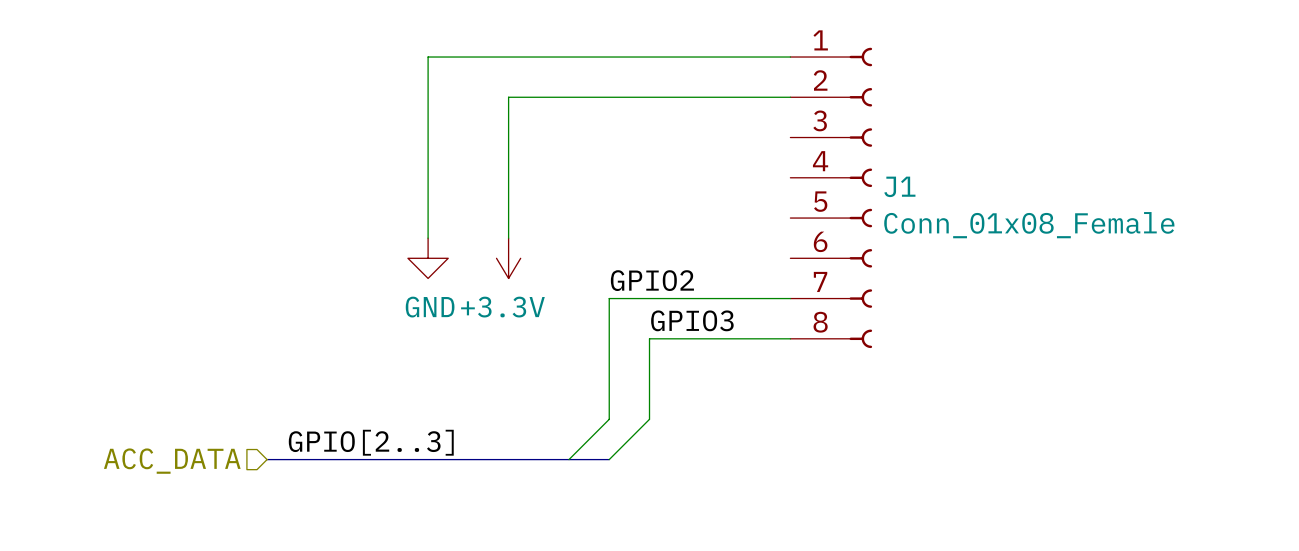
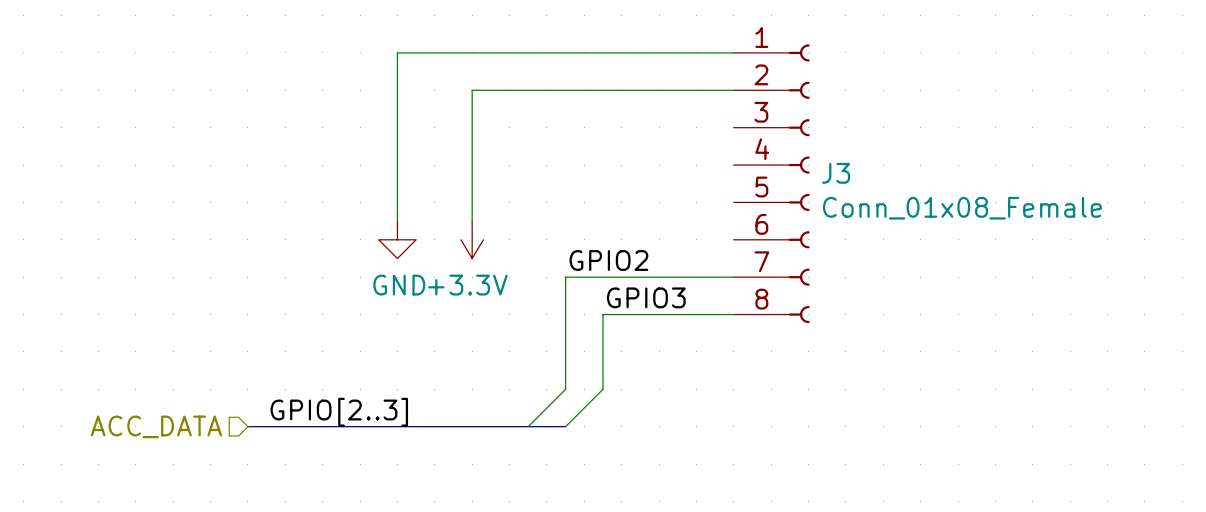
J1 name: J1 (899, 186) -> J3 (836, 173)

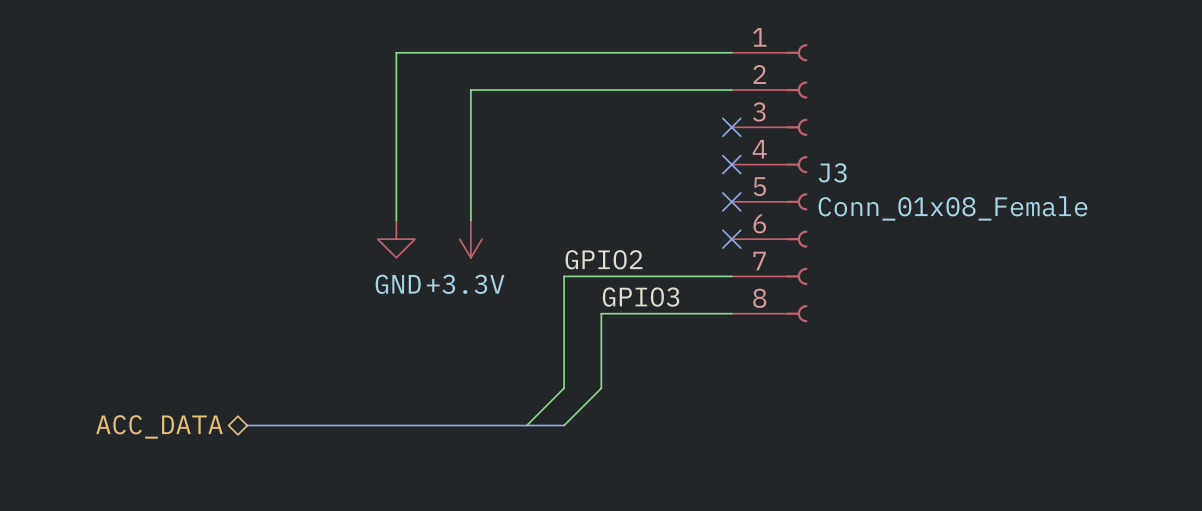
no-connect mark: none -> (731, 127)
no-connect mark: none -> (731, 164)
no-connect mark: none -> (731, 201)
no-connect mark: none -> (731, 239)
label: GPIO[2..3] (339, 412) -> none
hierarchical label shape: input (156, 426) -> bidirectional (159, 426)

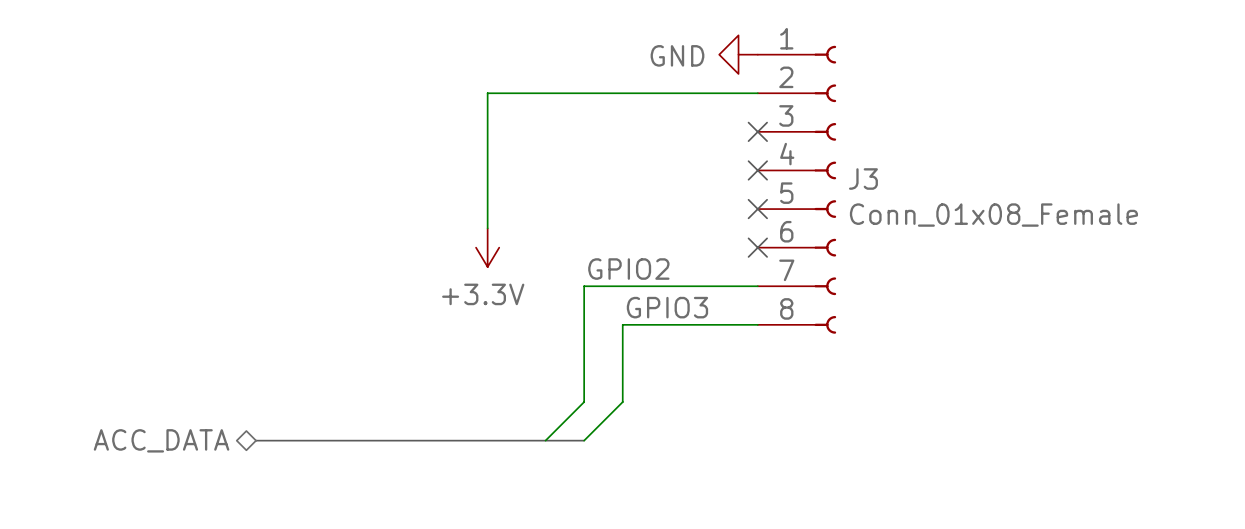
power symbol: none -> GND (738, 54)
wire: (731, 52) (396, 52) (396, 220) -> none
power symbol: GND (396, 239) -> none

